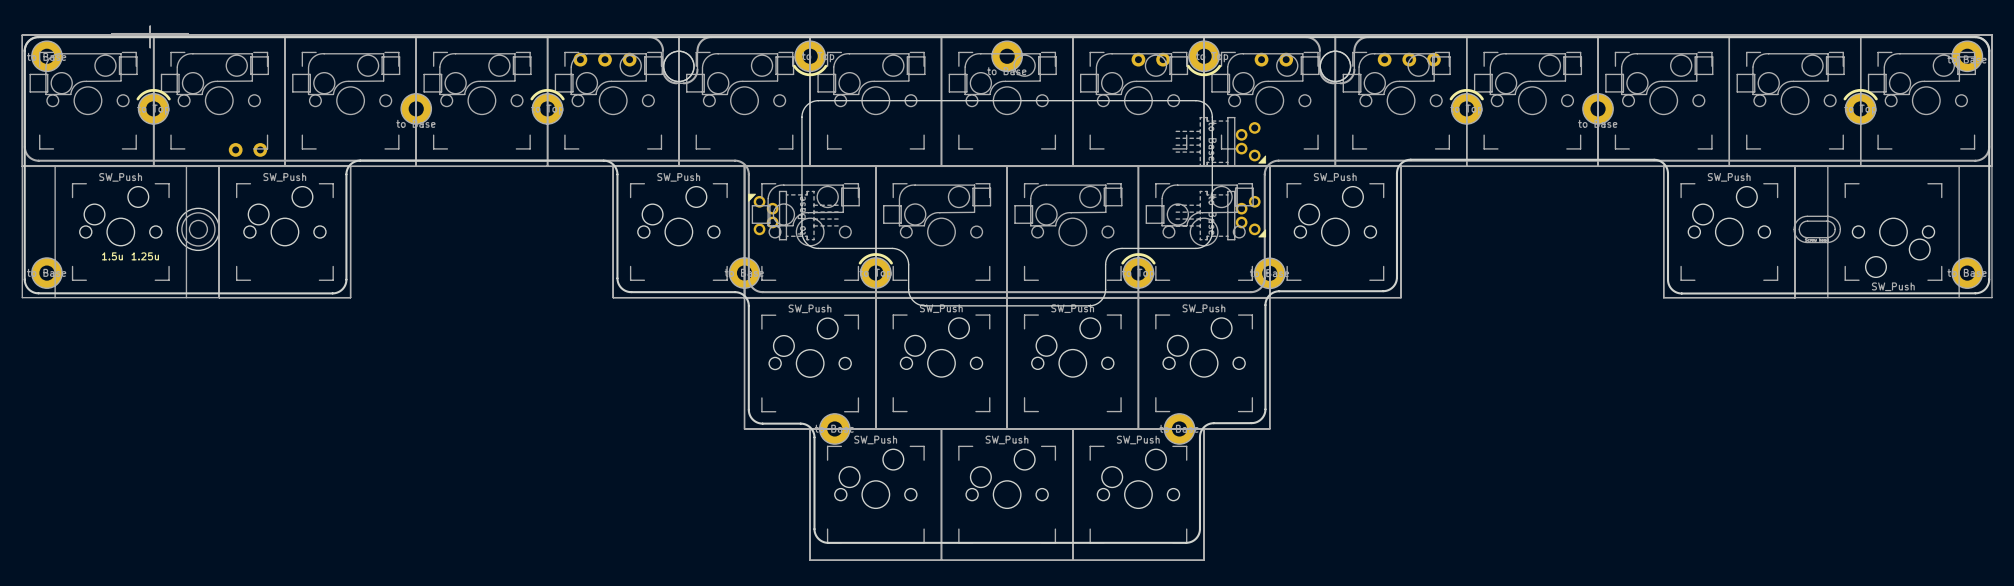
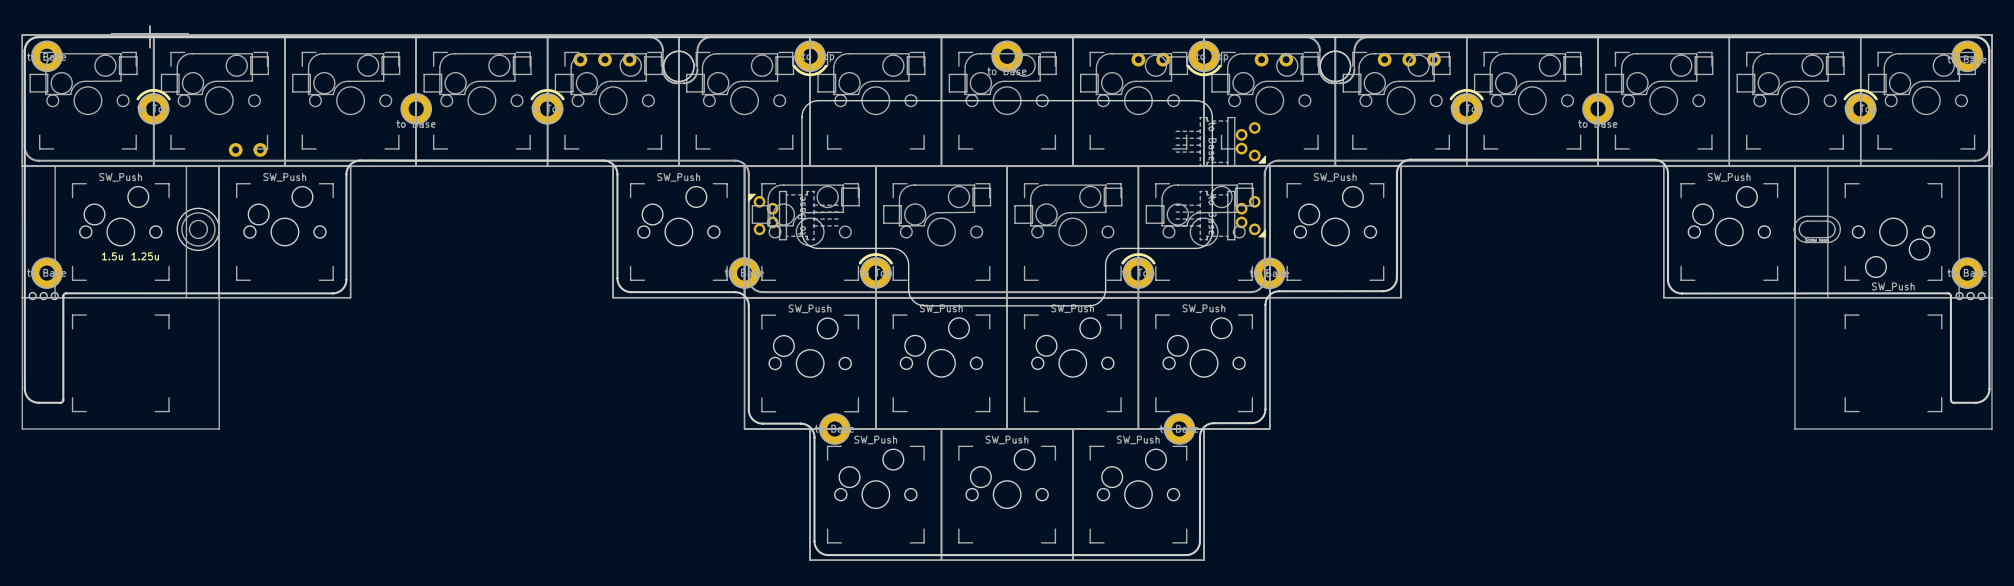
part footprint: [21, 25, 1993, 561] -> [21, 25, 1993, 561]

